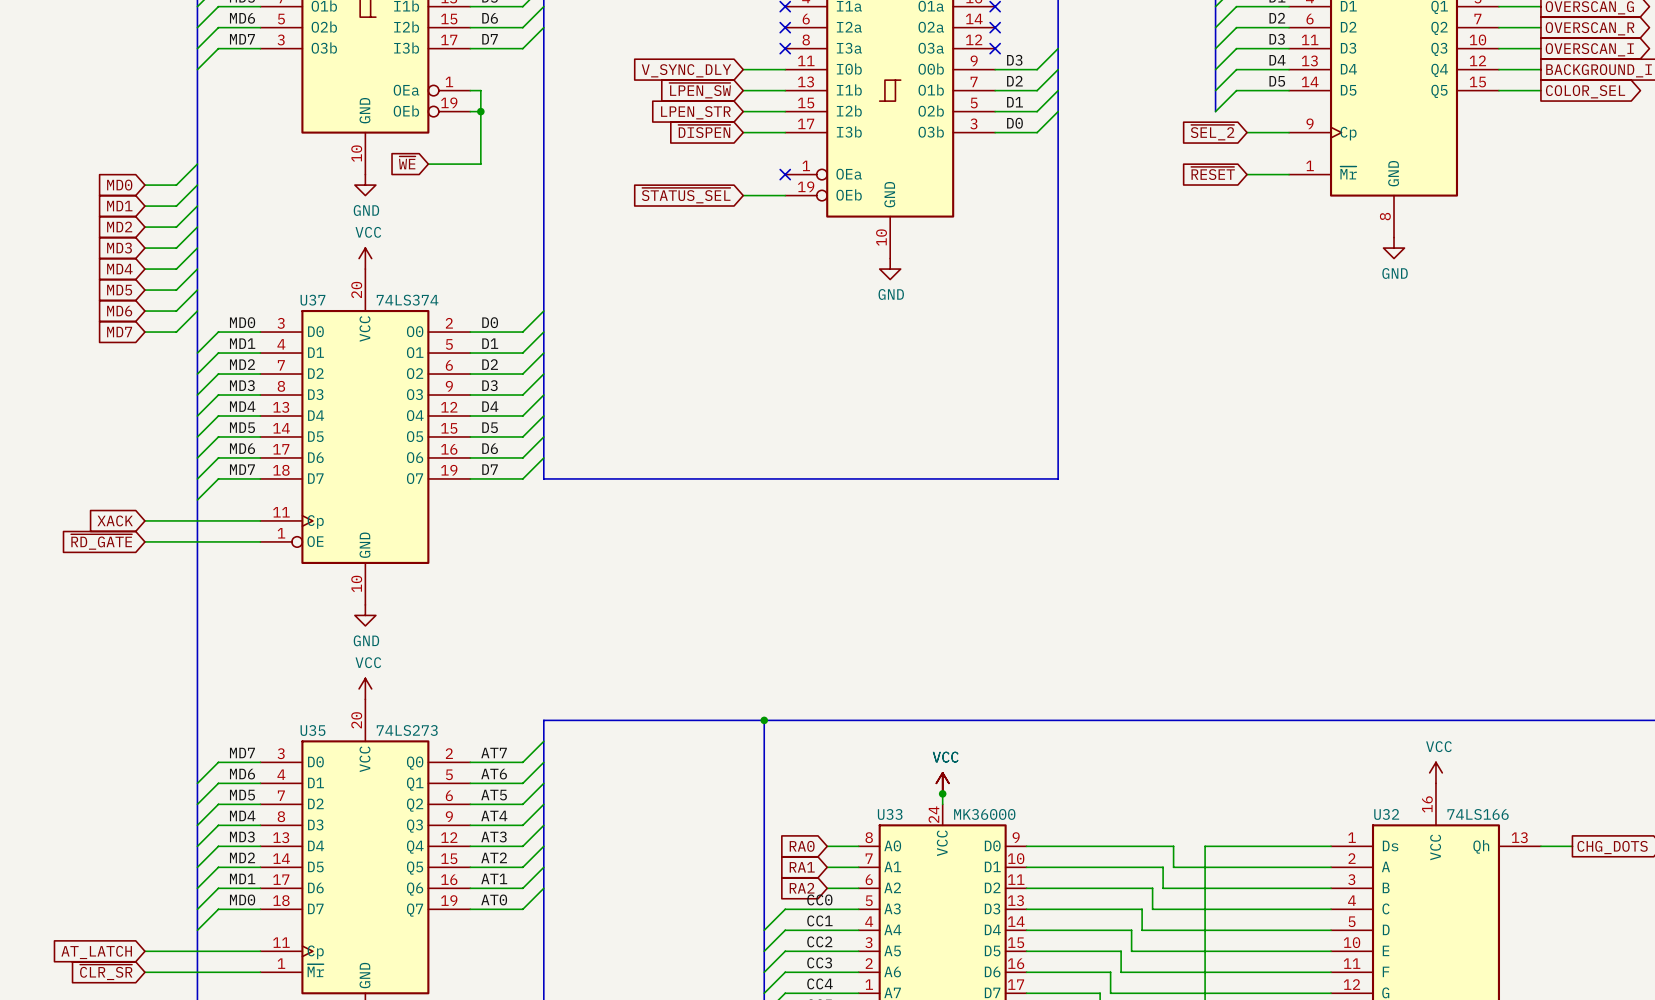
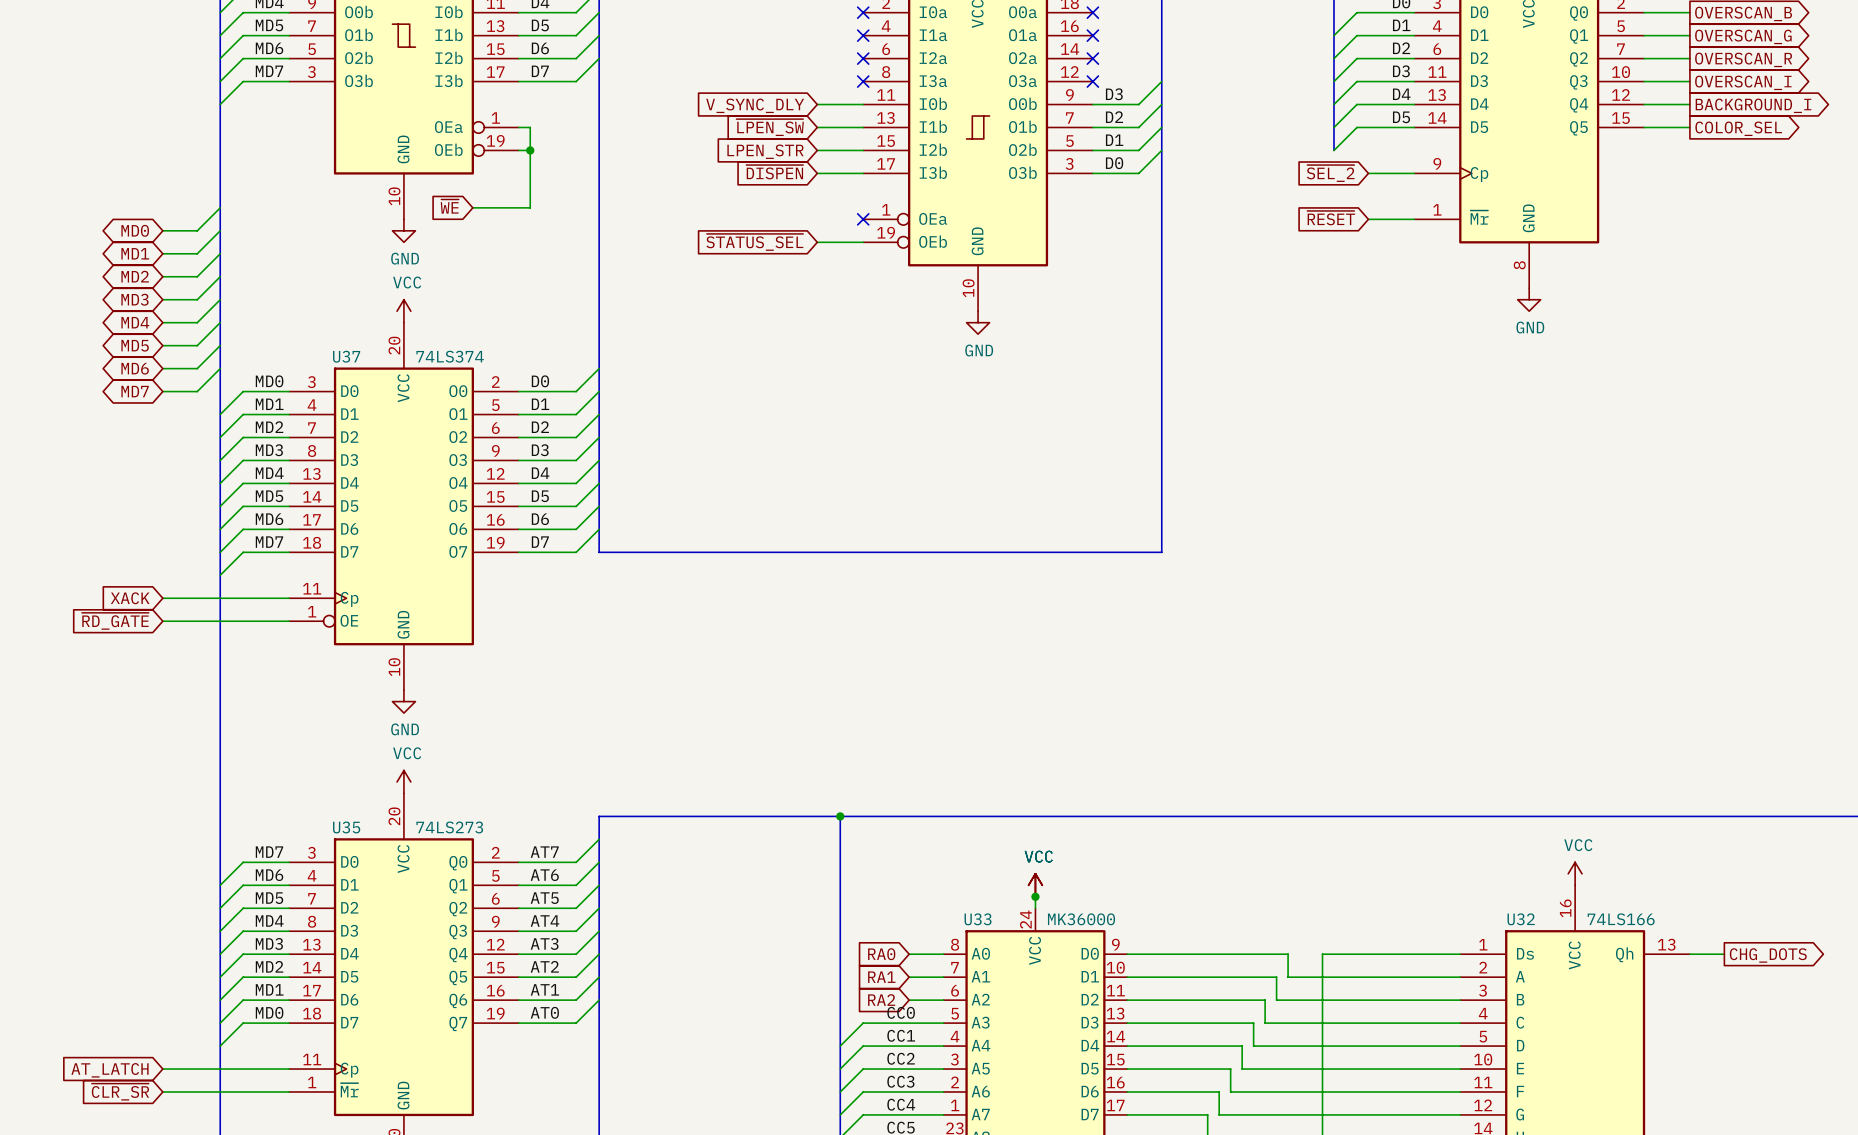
global label shape: input (119, 185) -> bidirectional (135, 230)
global label shape: input (119, 206) -> bidirectional (135, 253)
global label shape: input (119, 226) -> bidirectional (135, 276)
global label shape: input (119, 248) -> bidirectional (134, 299)
global label shape: input (119, 269) -> bidirectional (135, 322)
global label shape: input (119, 290) -> bidirectional (135, 345)
global label shape: input (119, 311) -> bidirectional (135, 368)
global label shape: input (119, 332) -> bidirectional (135, 391)

